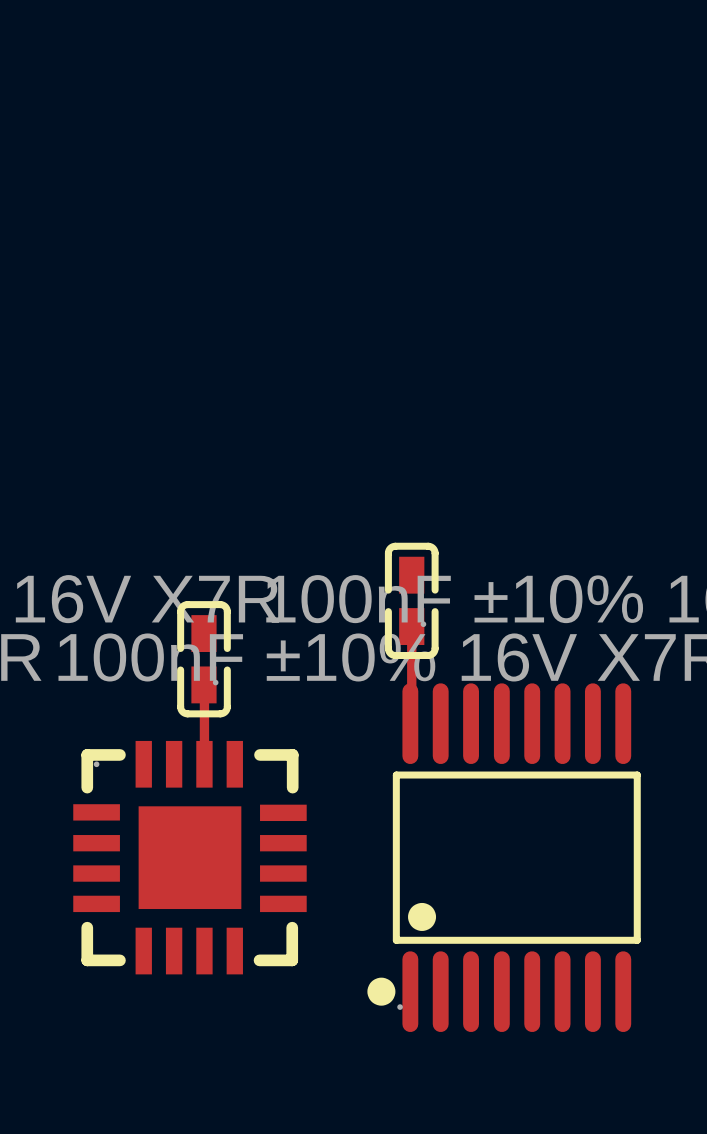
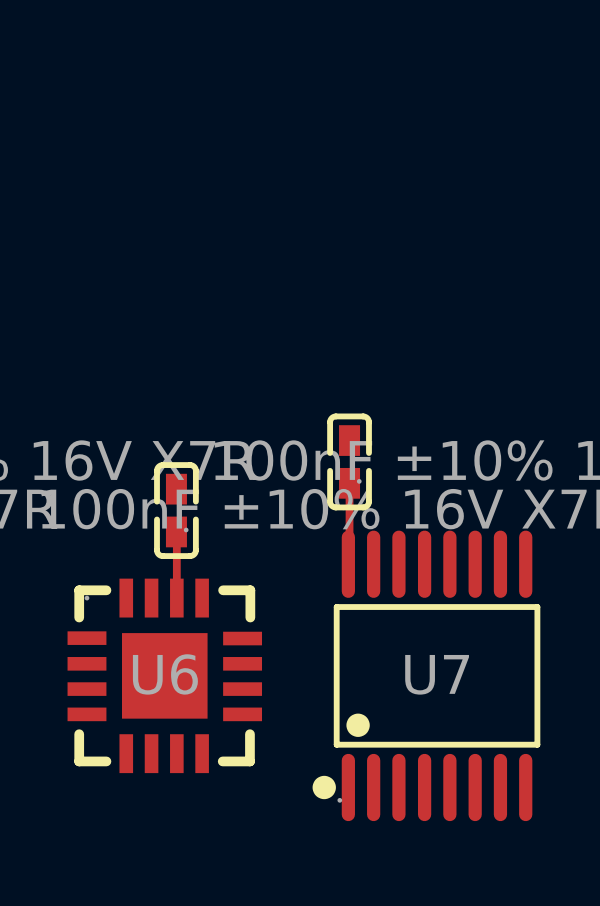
U6 name: none -> U6 (165, 674)
U7 name: none -> U7 (437, 674)

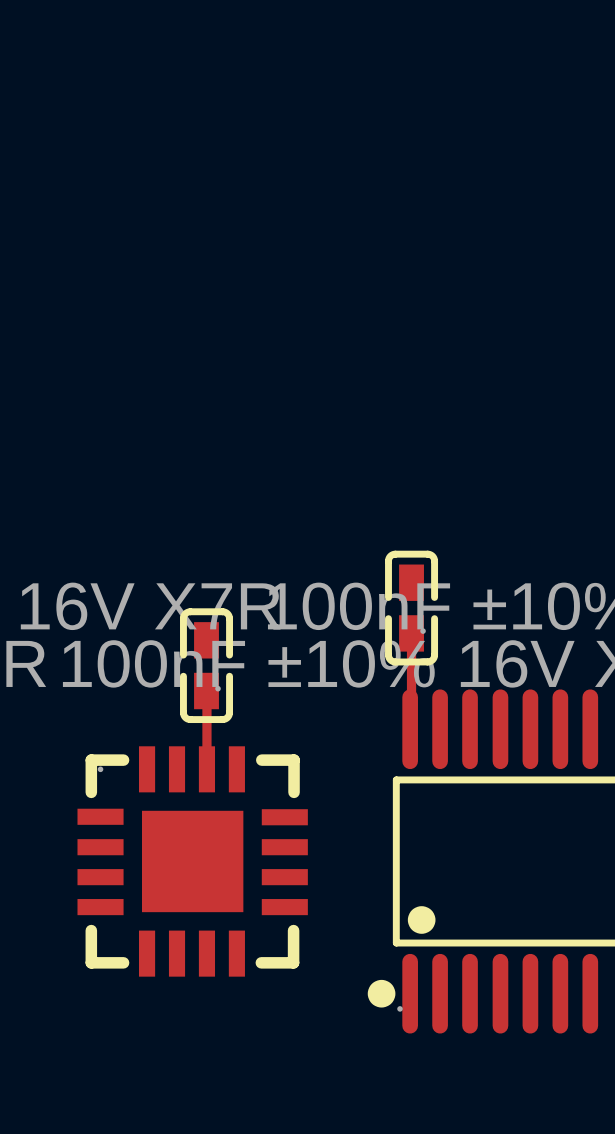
U6 name: U6 (165, 674) -> none
U7 name: U7 (437, 674) -> none

